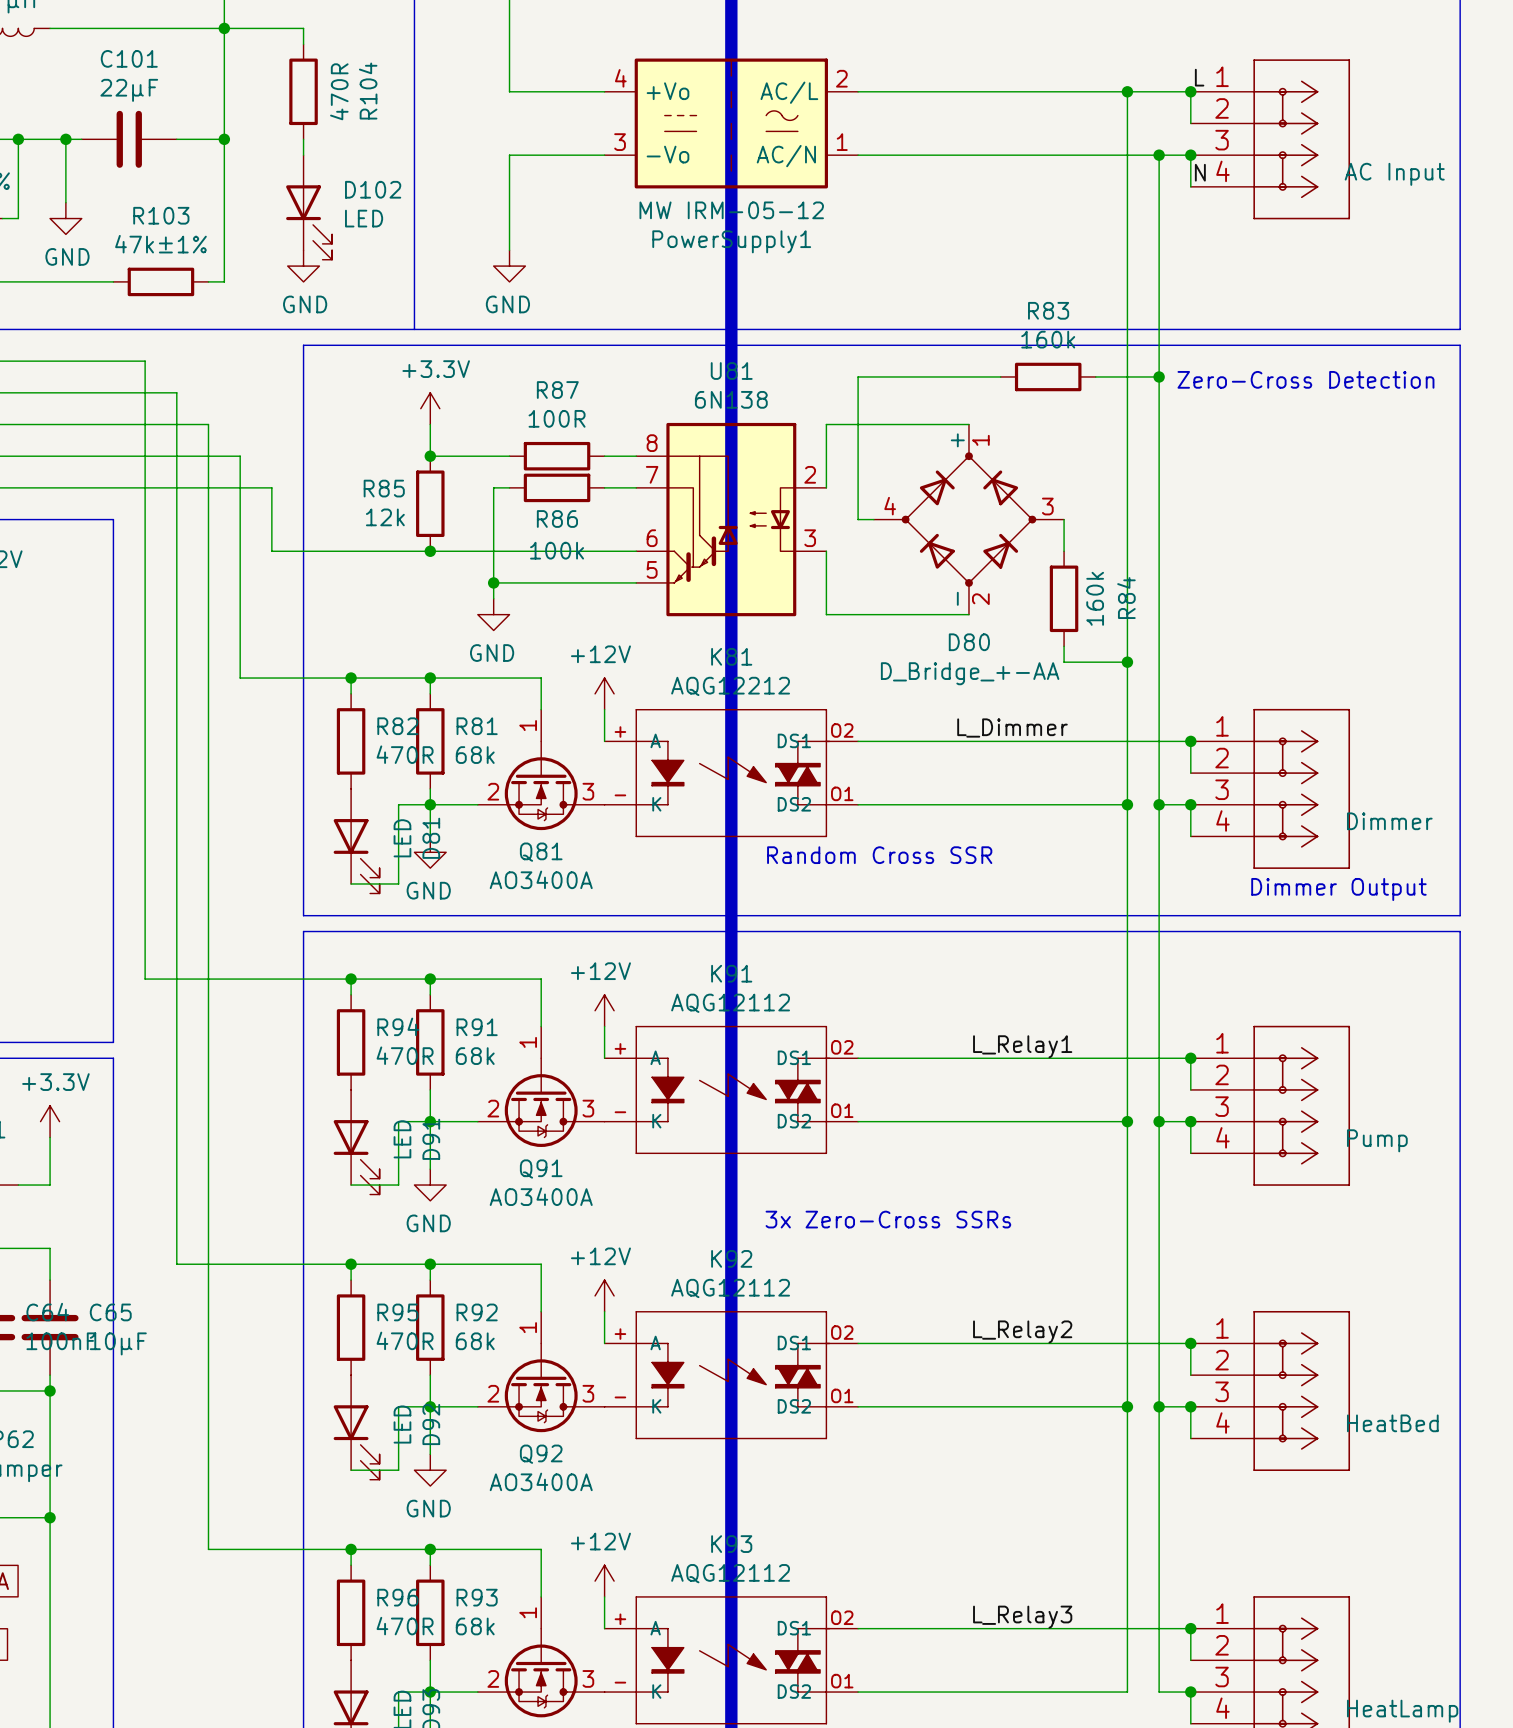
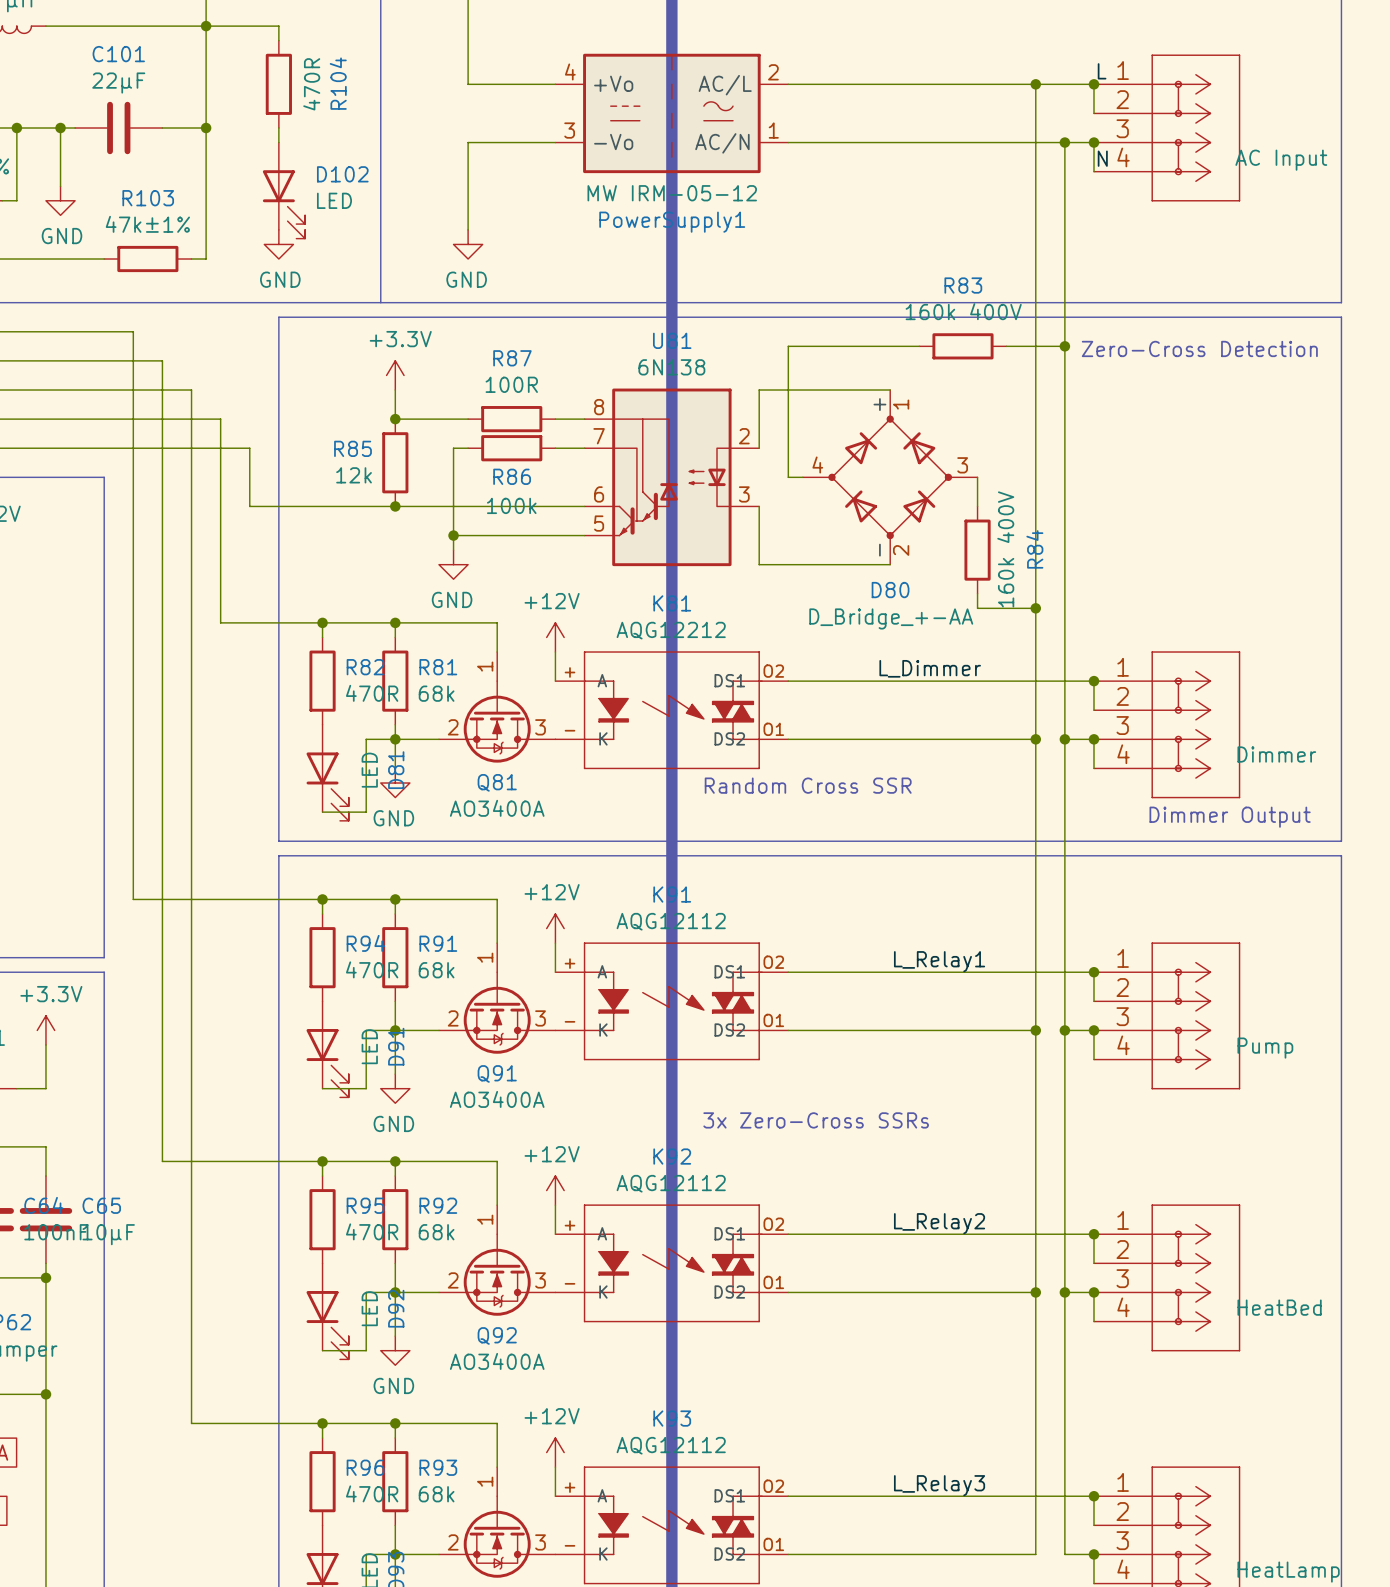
R83 value: 160k (1048, 339) -> 160k 400V (963, 311)
R84 value: 160k (1095, 598) -> 160k 400V (1005, 549)

